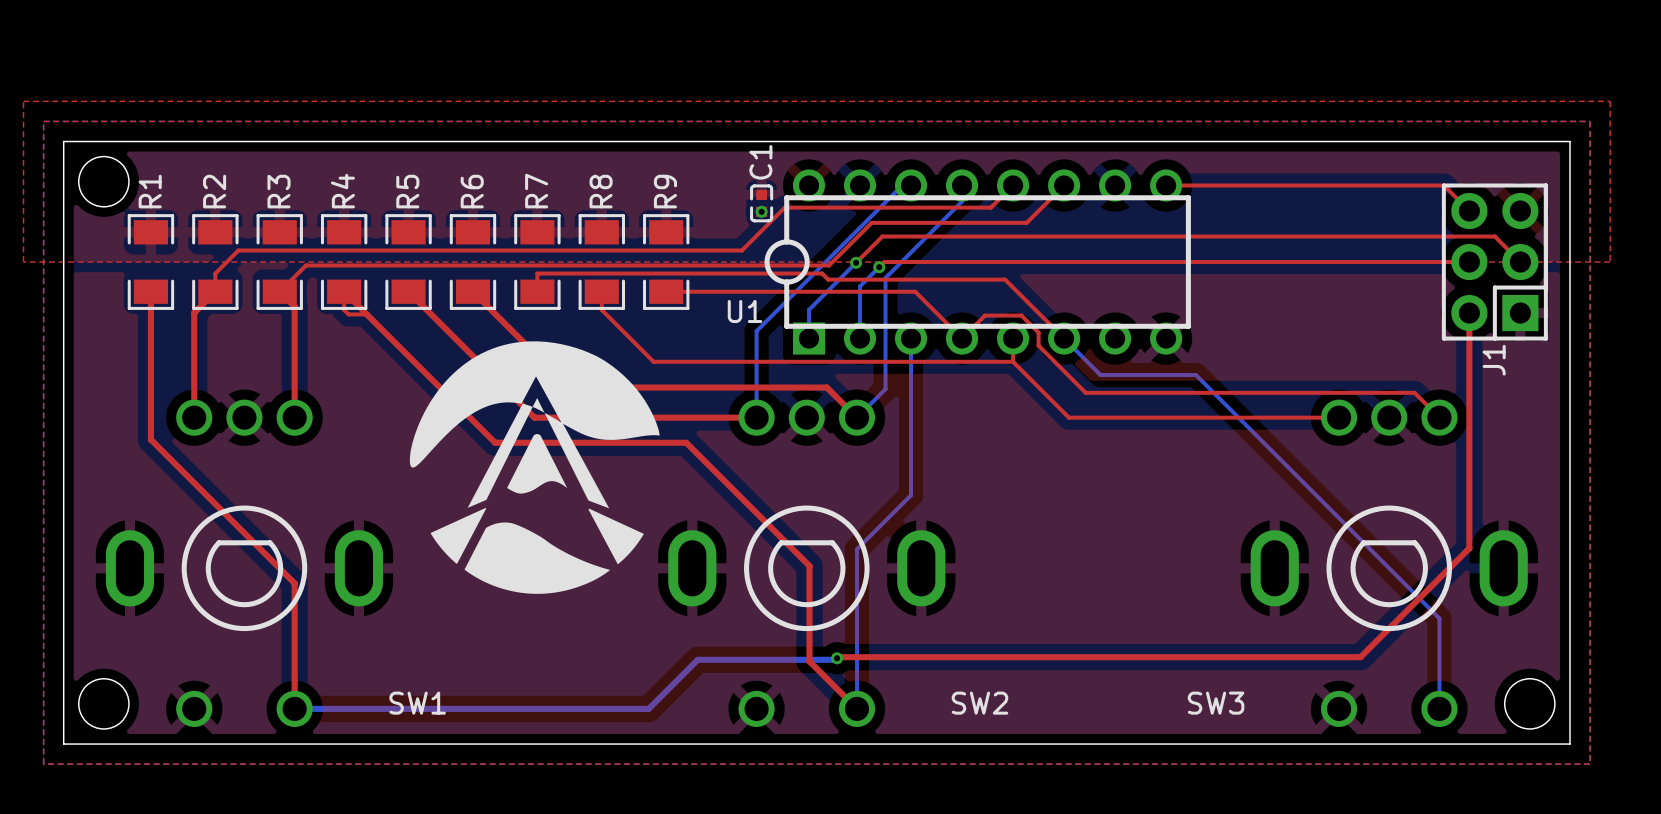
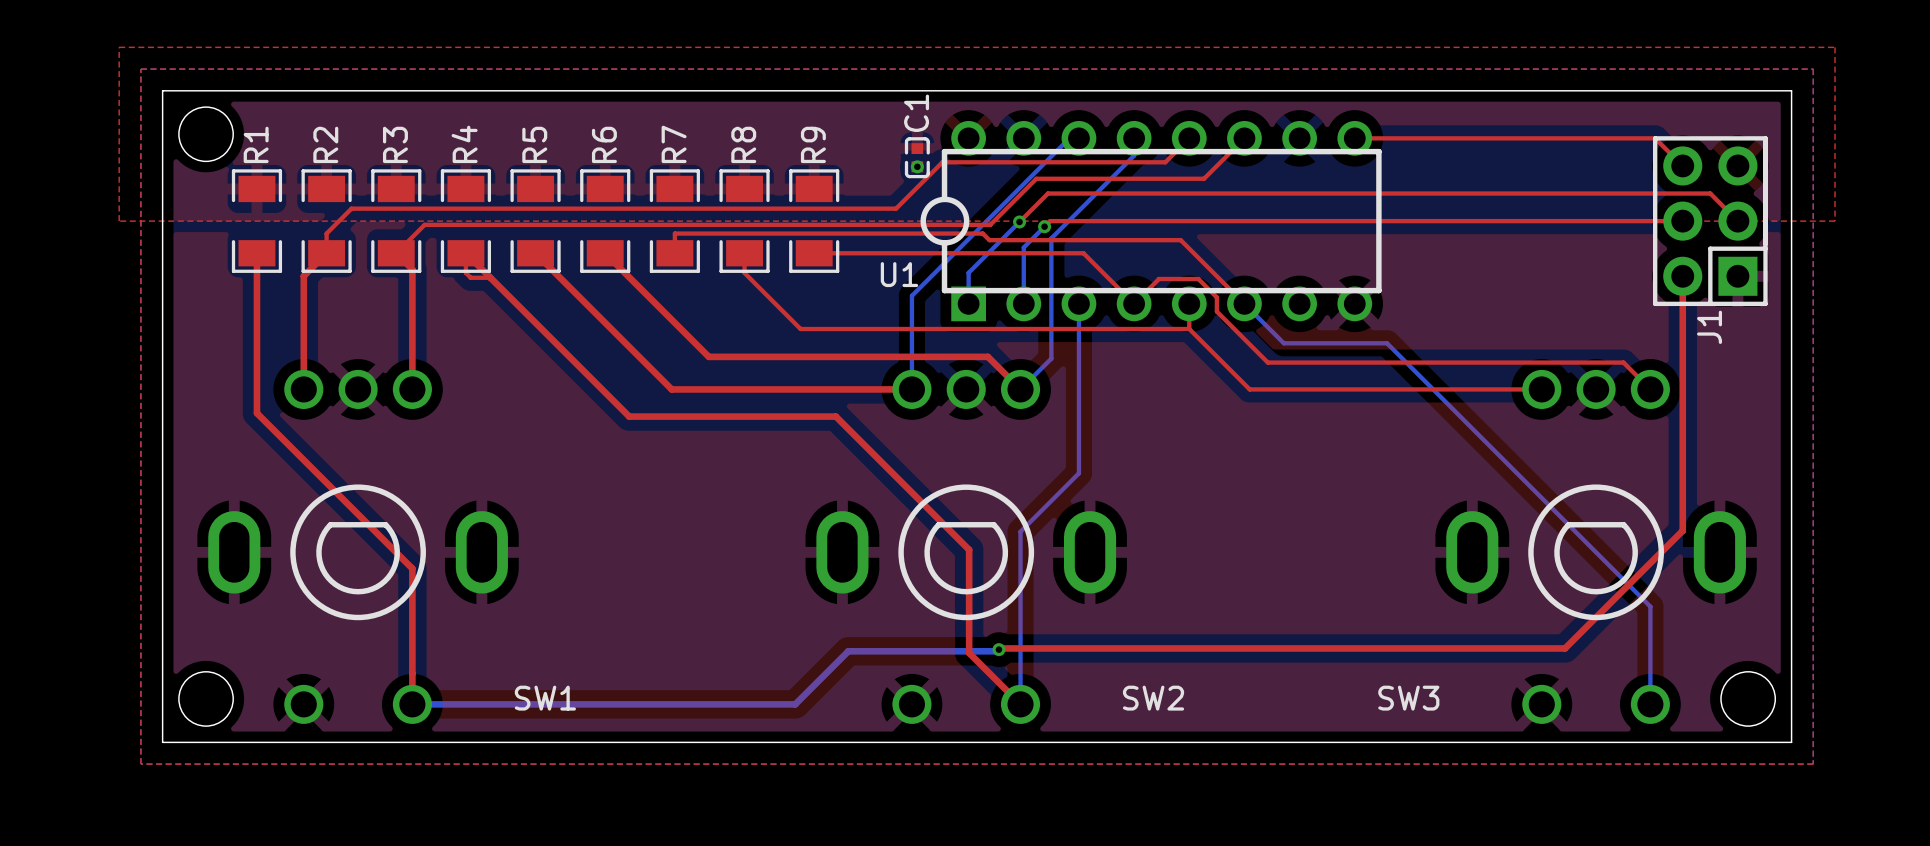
drawing: [409, 341, 660, 594] -> none

